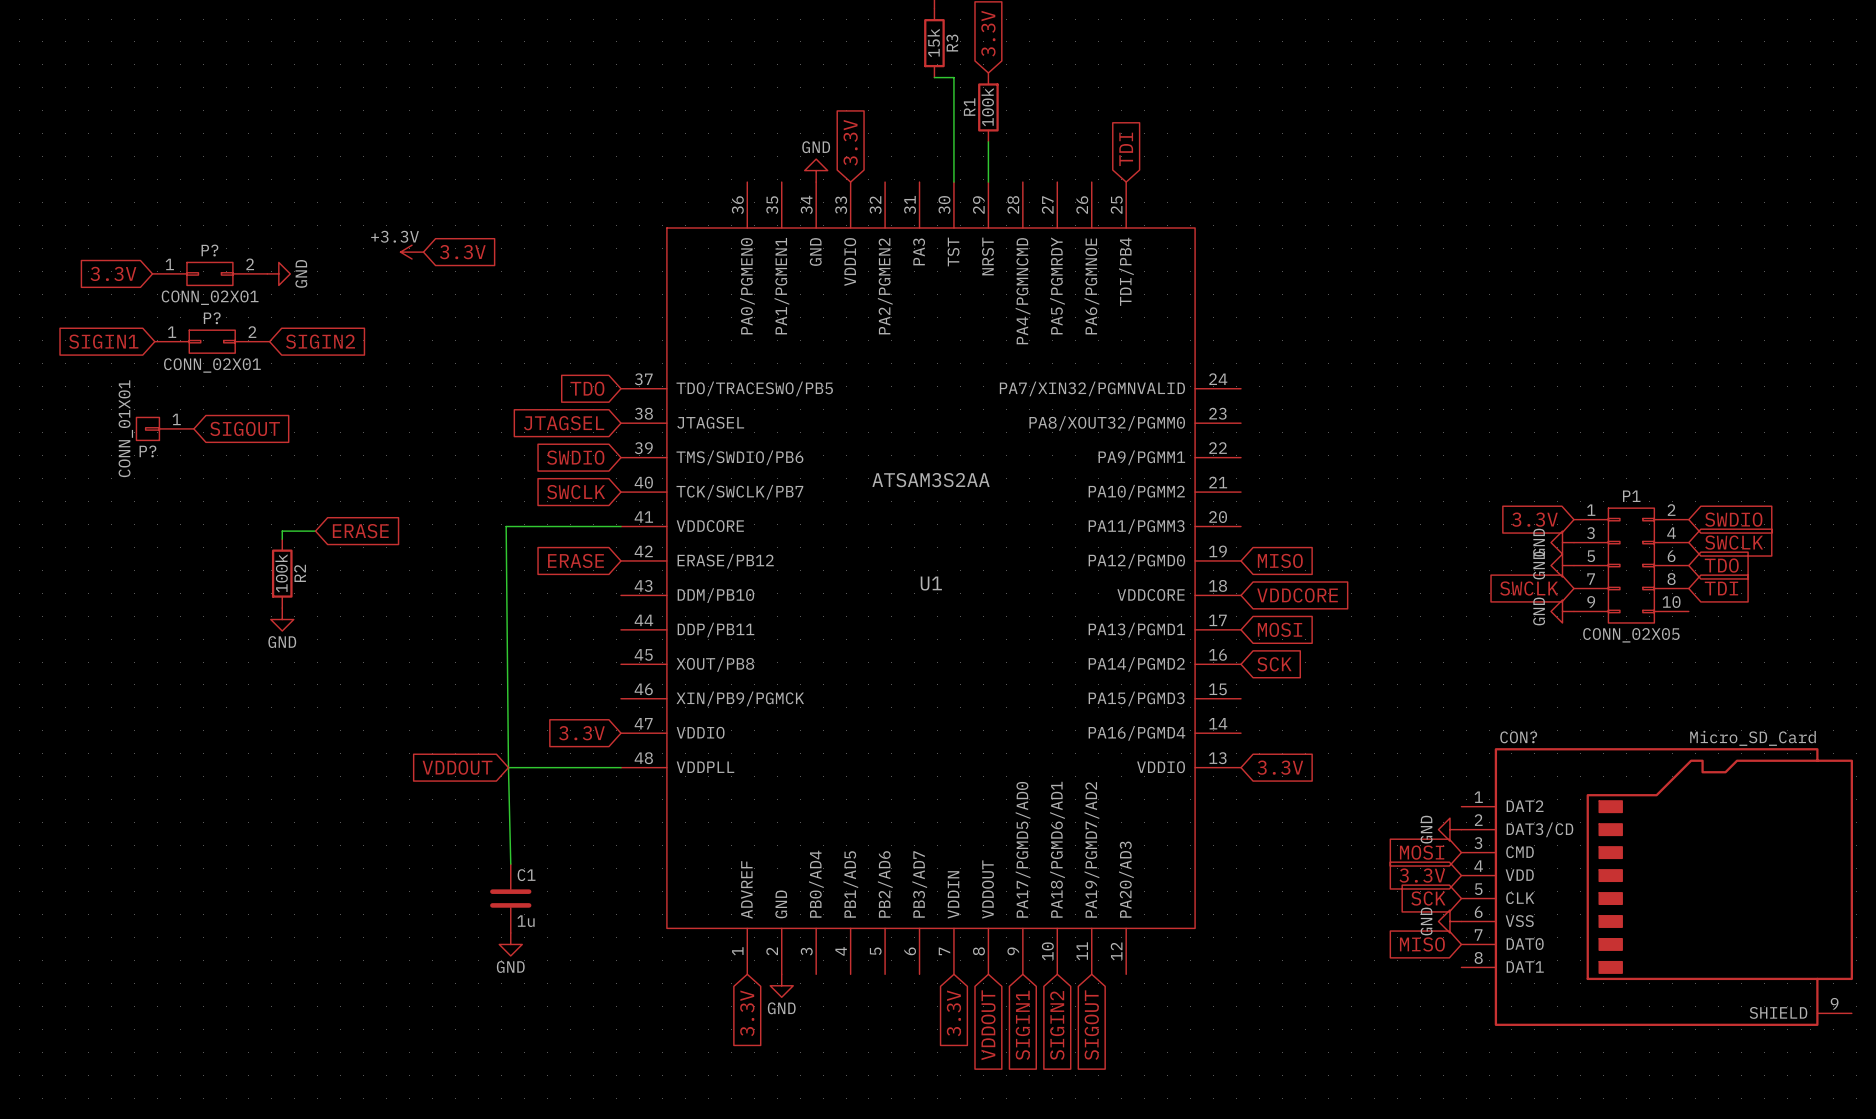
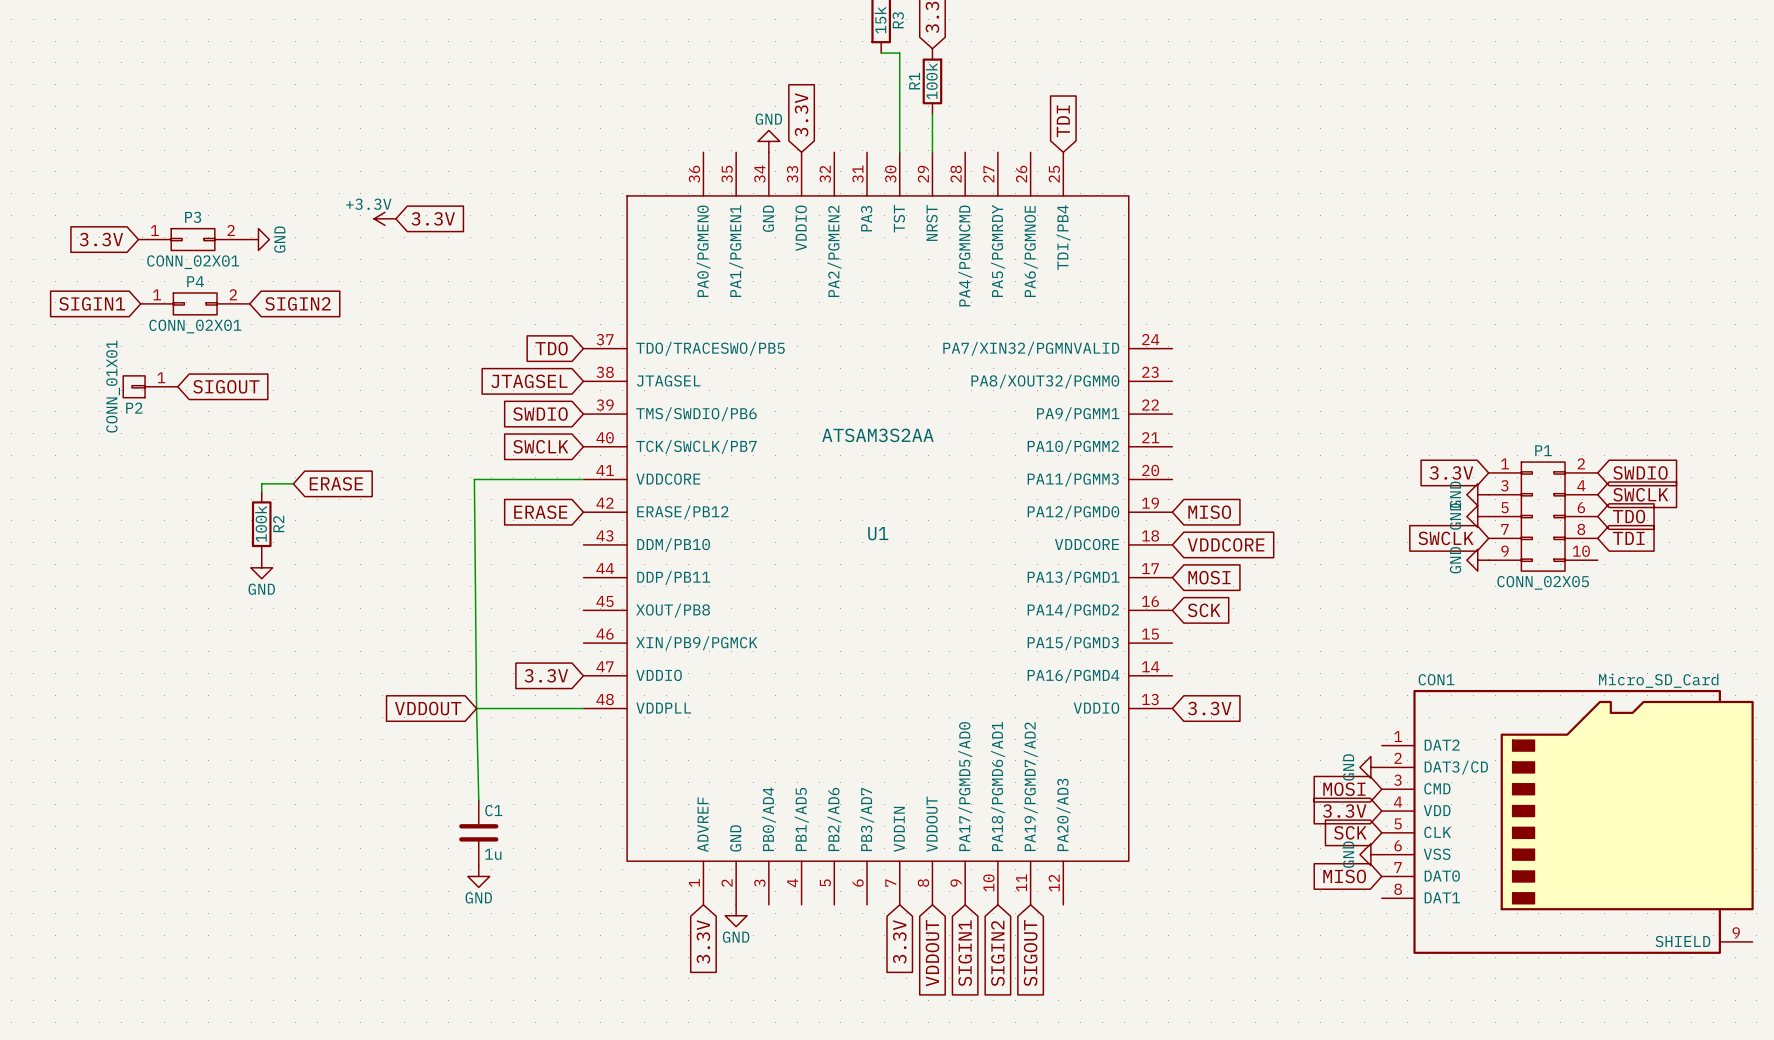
P? name: P? (209, 250) -> P3 (193, 217)
P? name: P? (212, 318) -> P4 (195, 281)
P? name: P? (147, 451) -> P2 (134, 408)
CON? name: CON? (1518, 737) -> CON1 (1436, 679)

